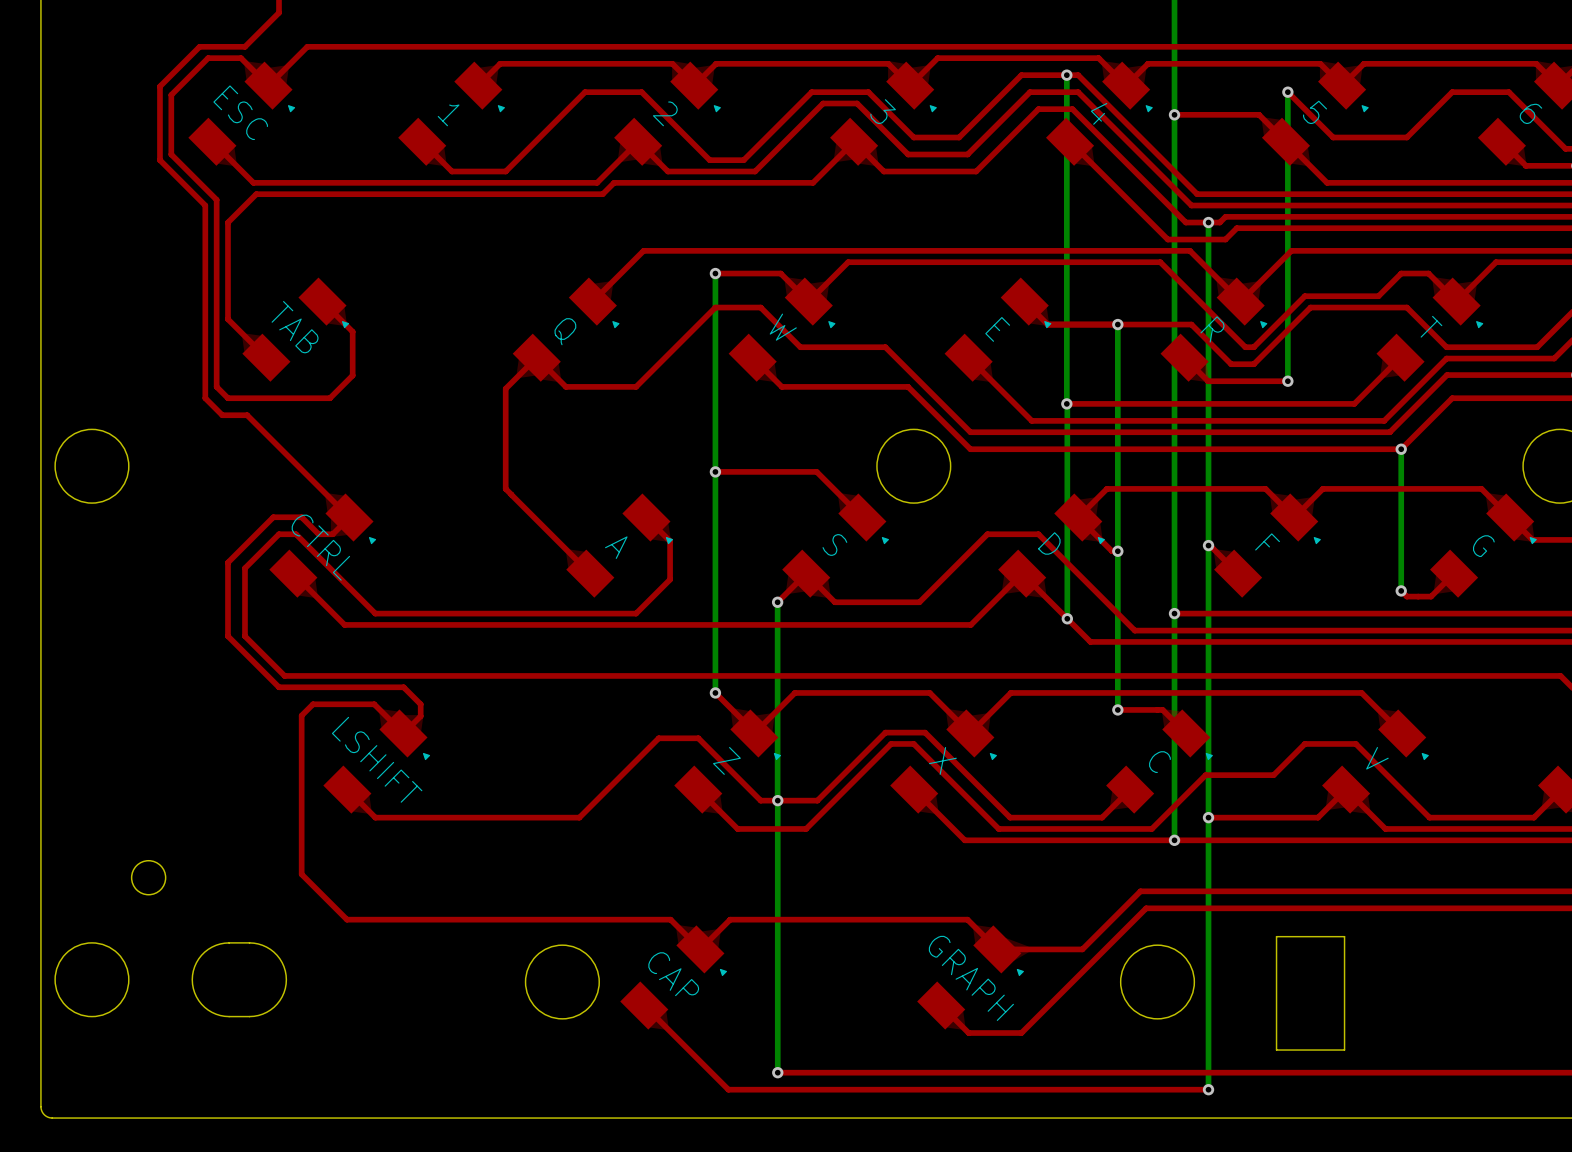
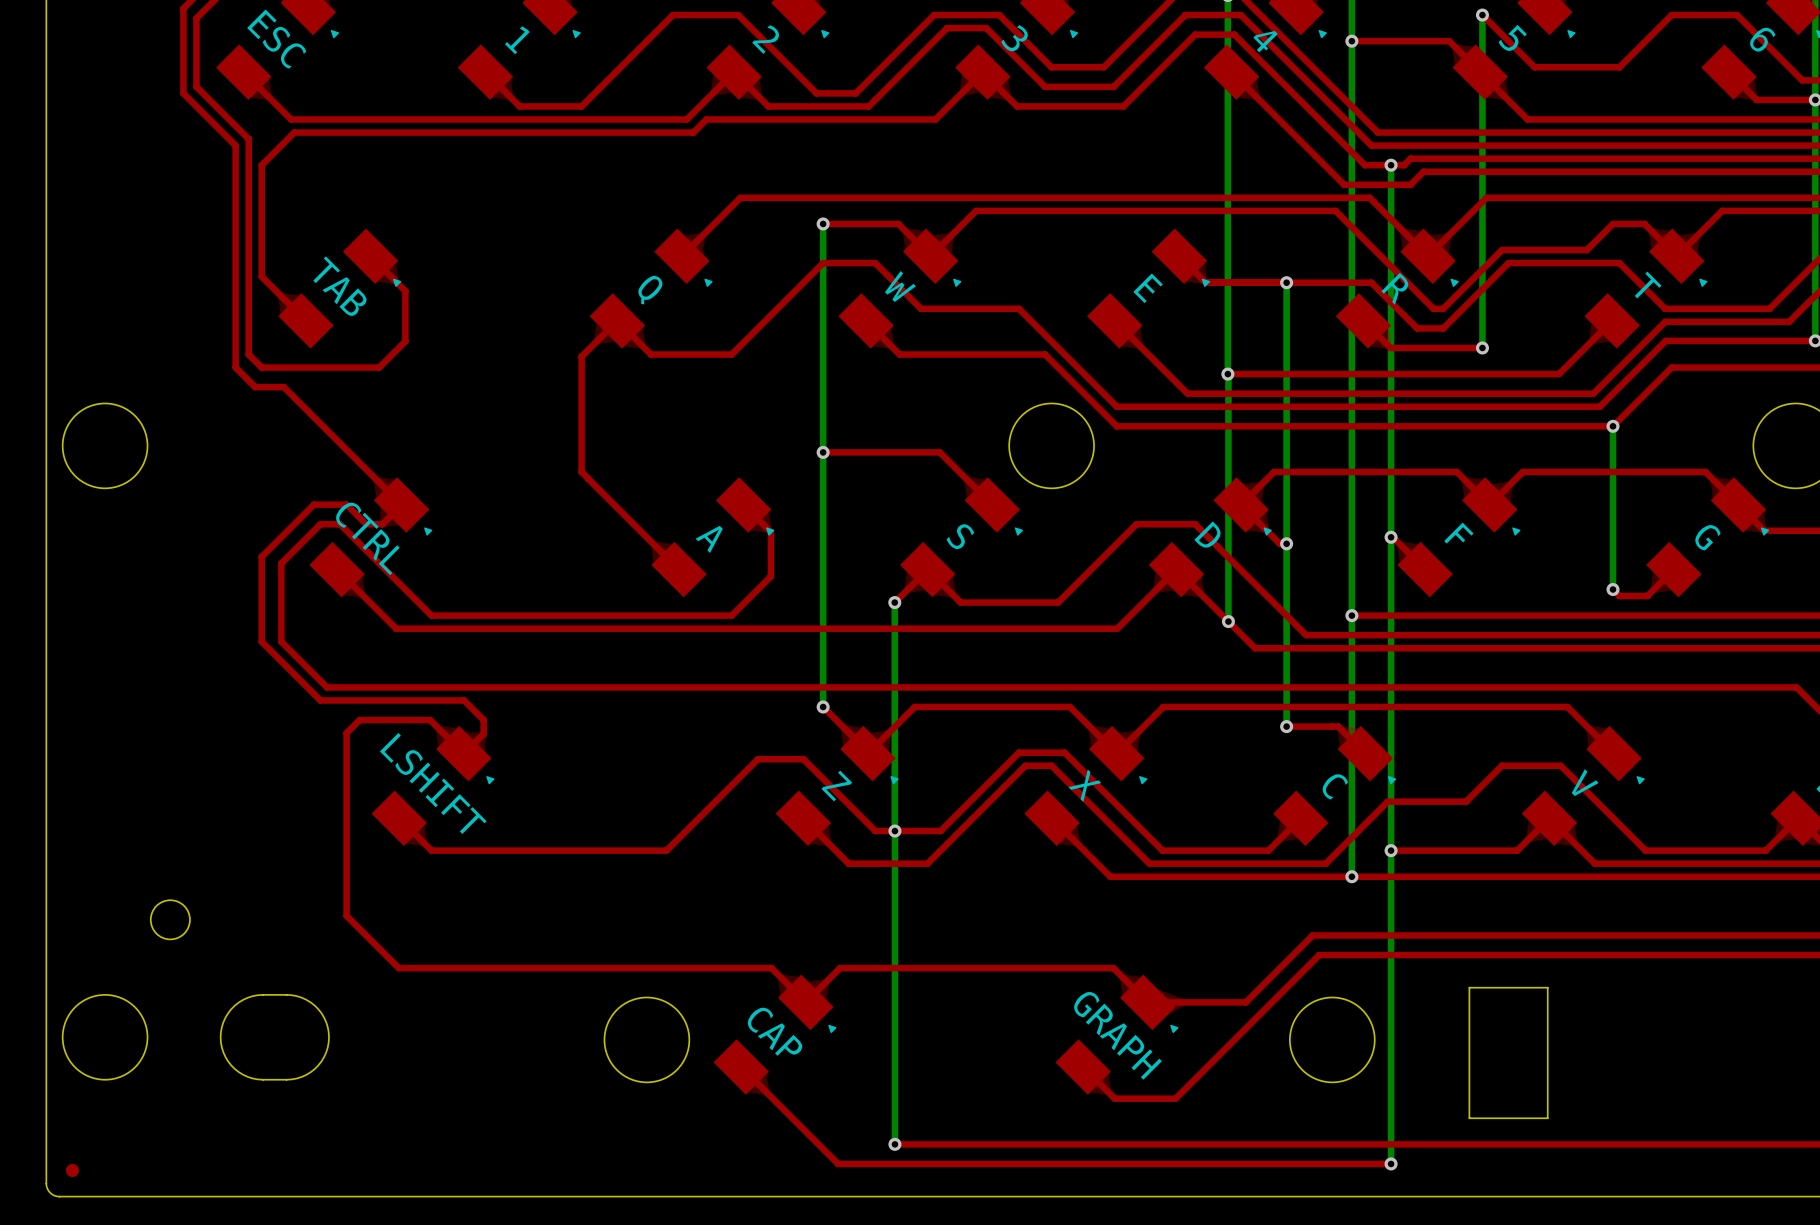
part: none -> (72, 1170)

